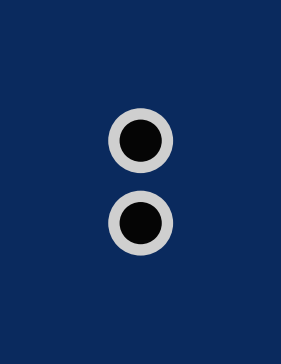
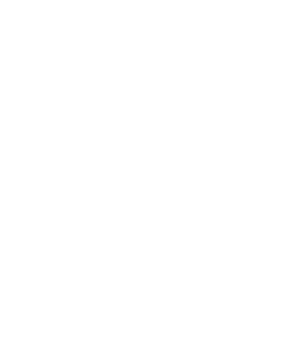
part: (140, 181) -> none

